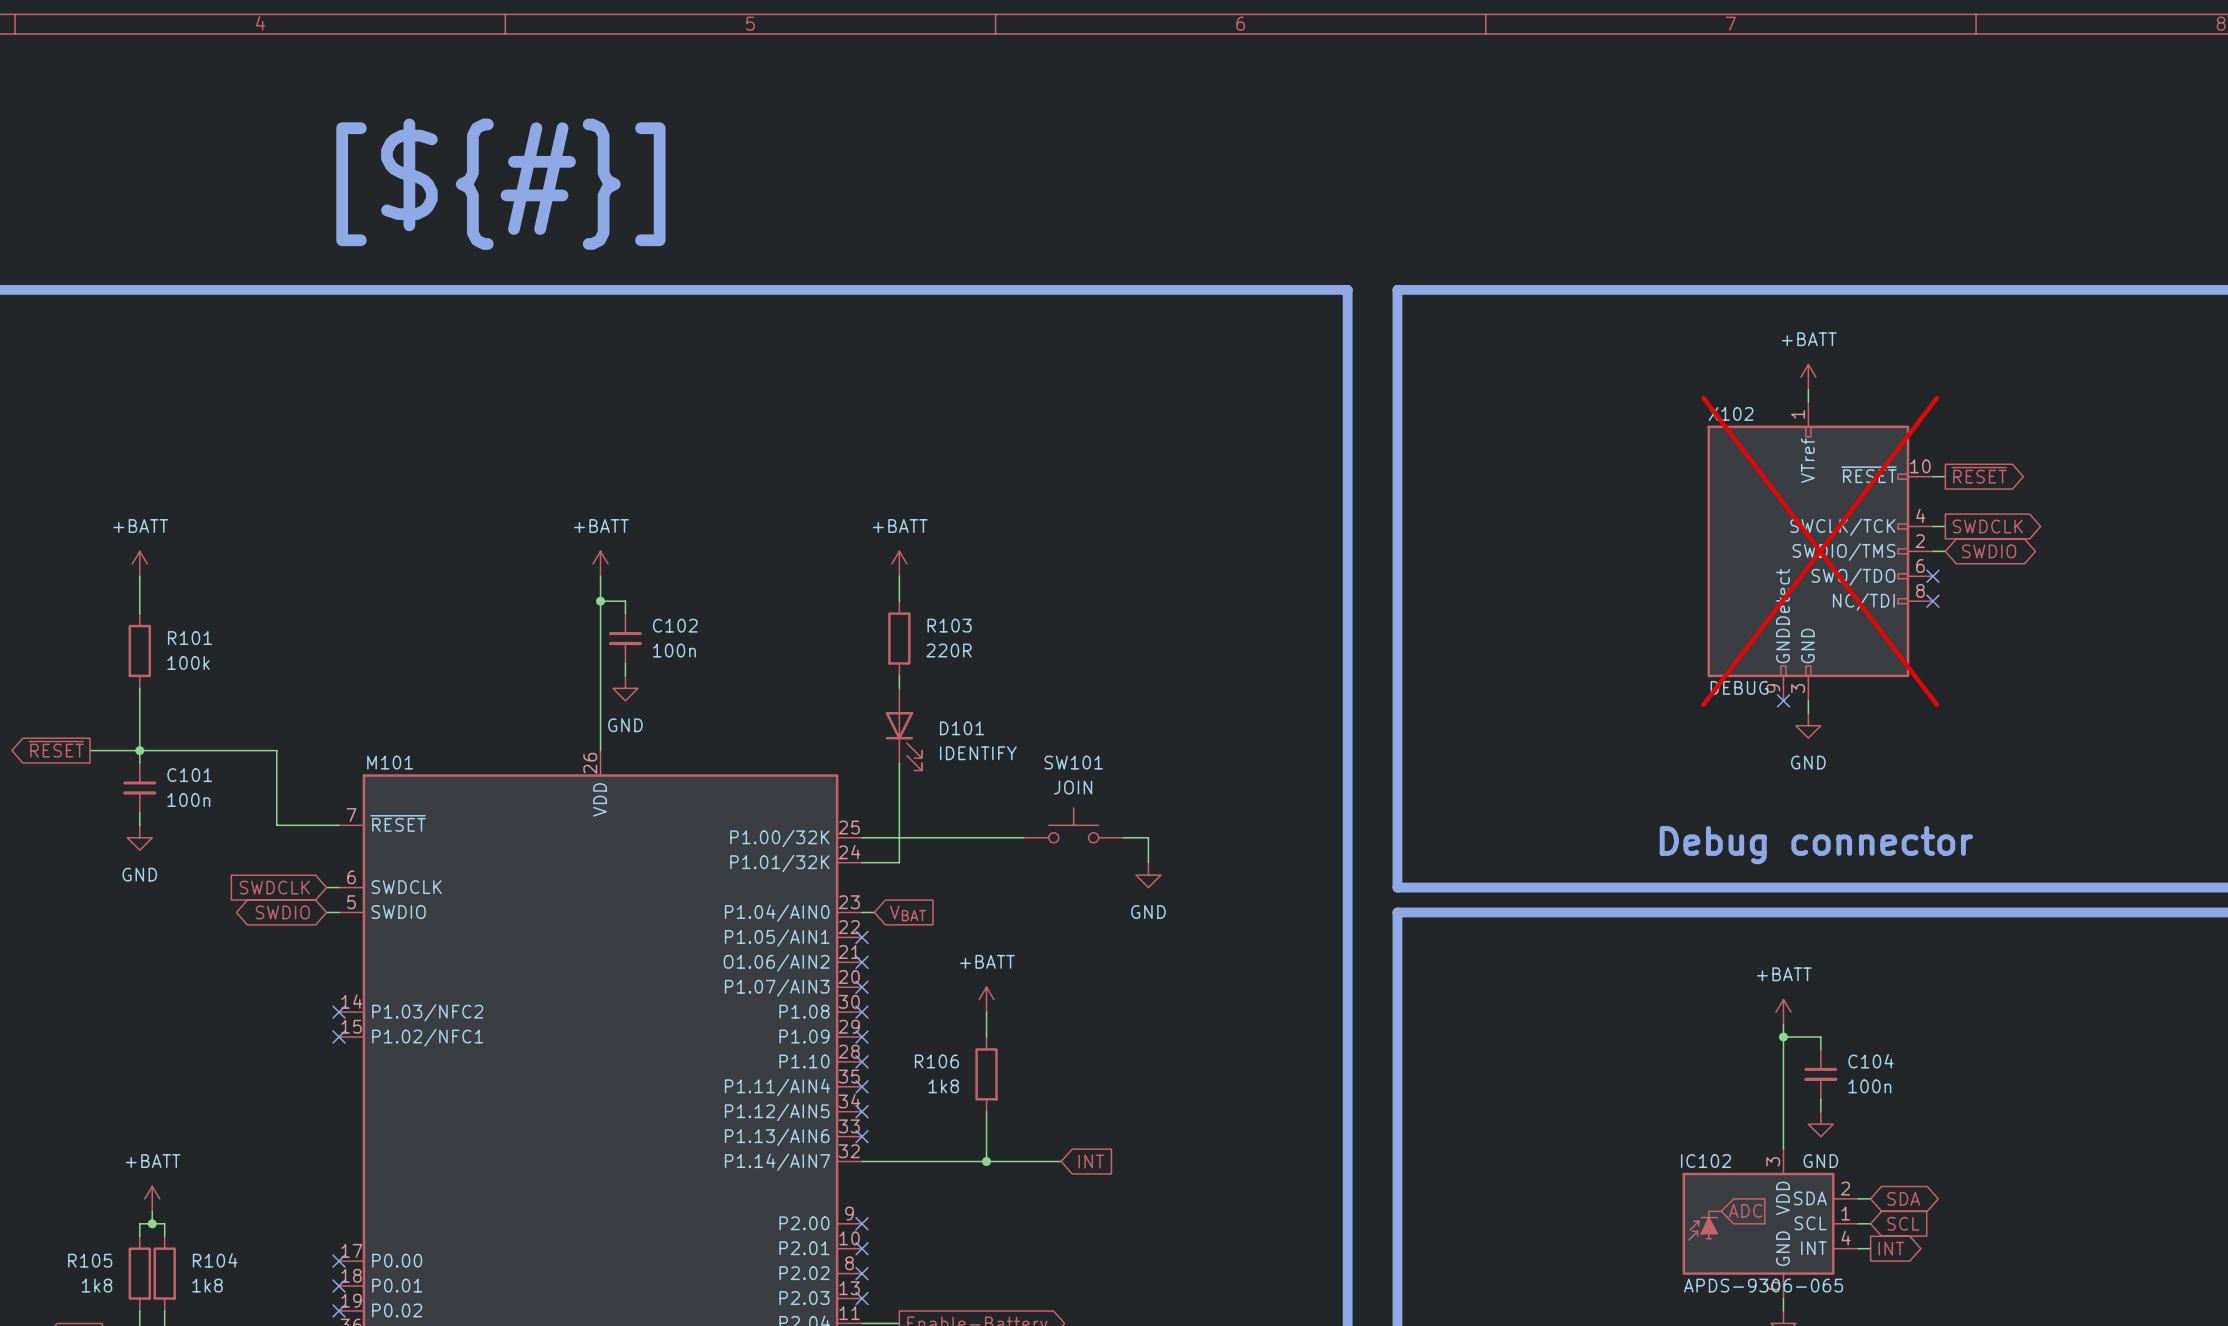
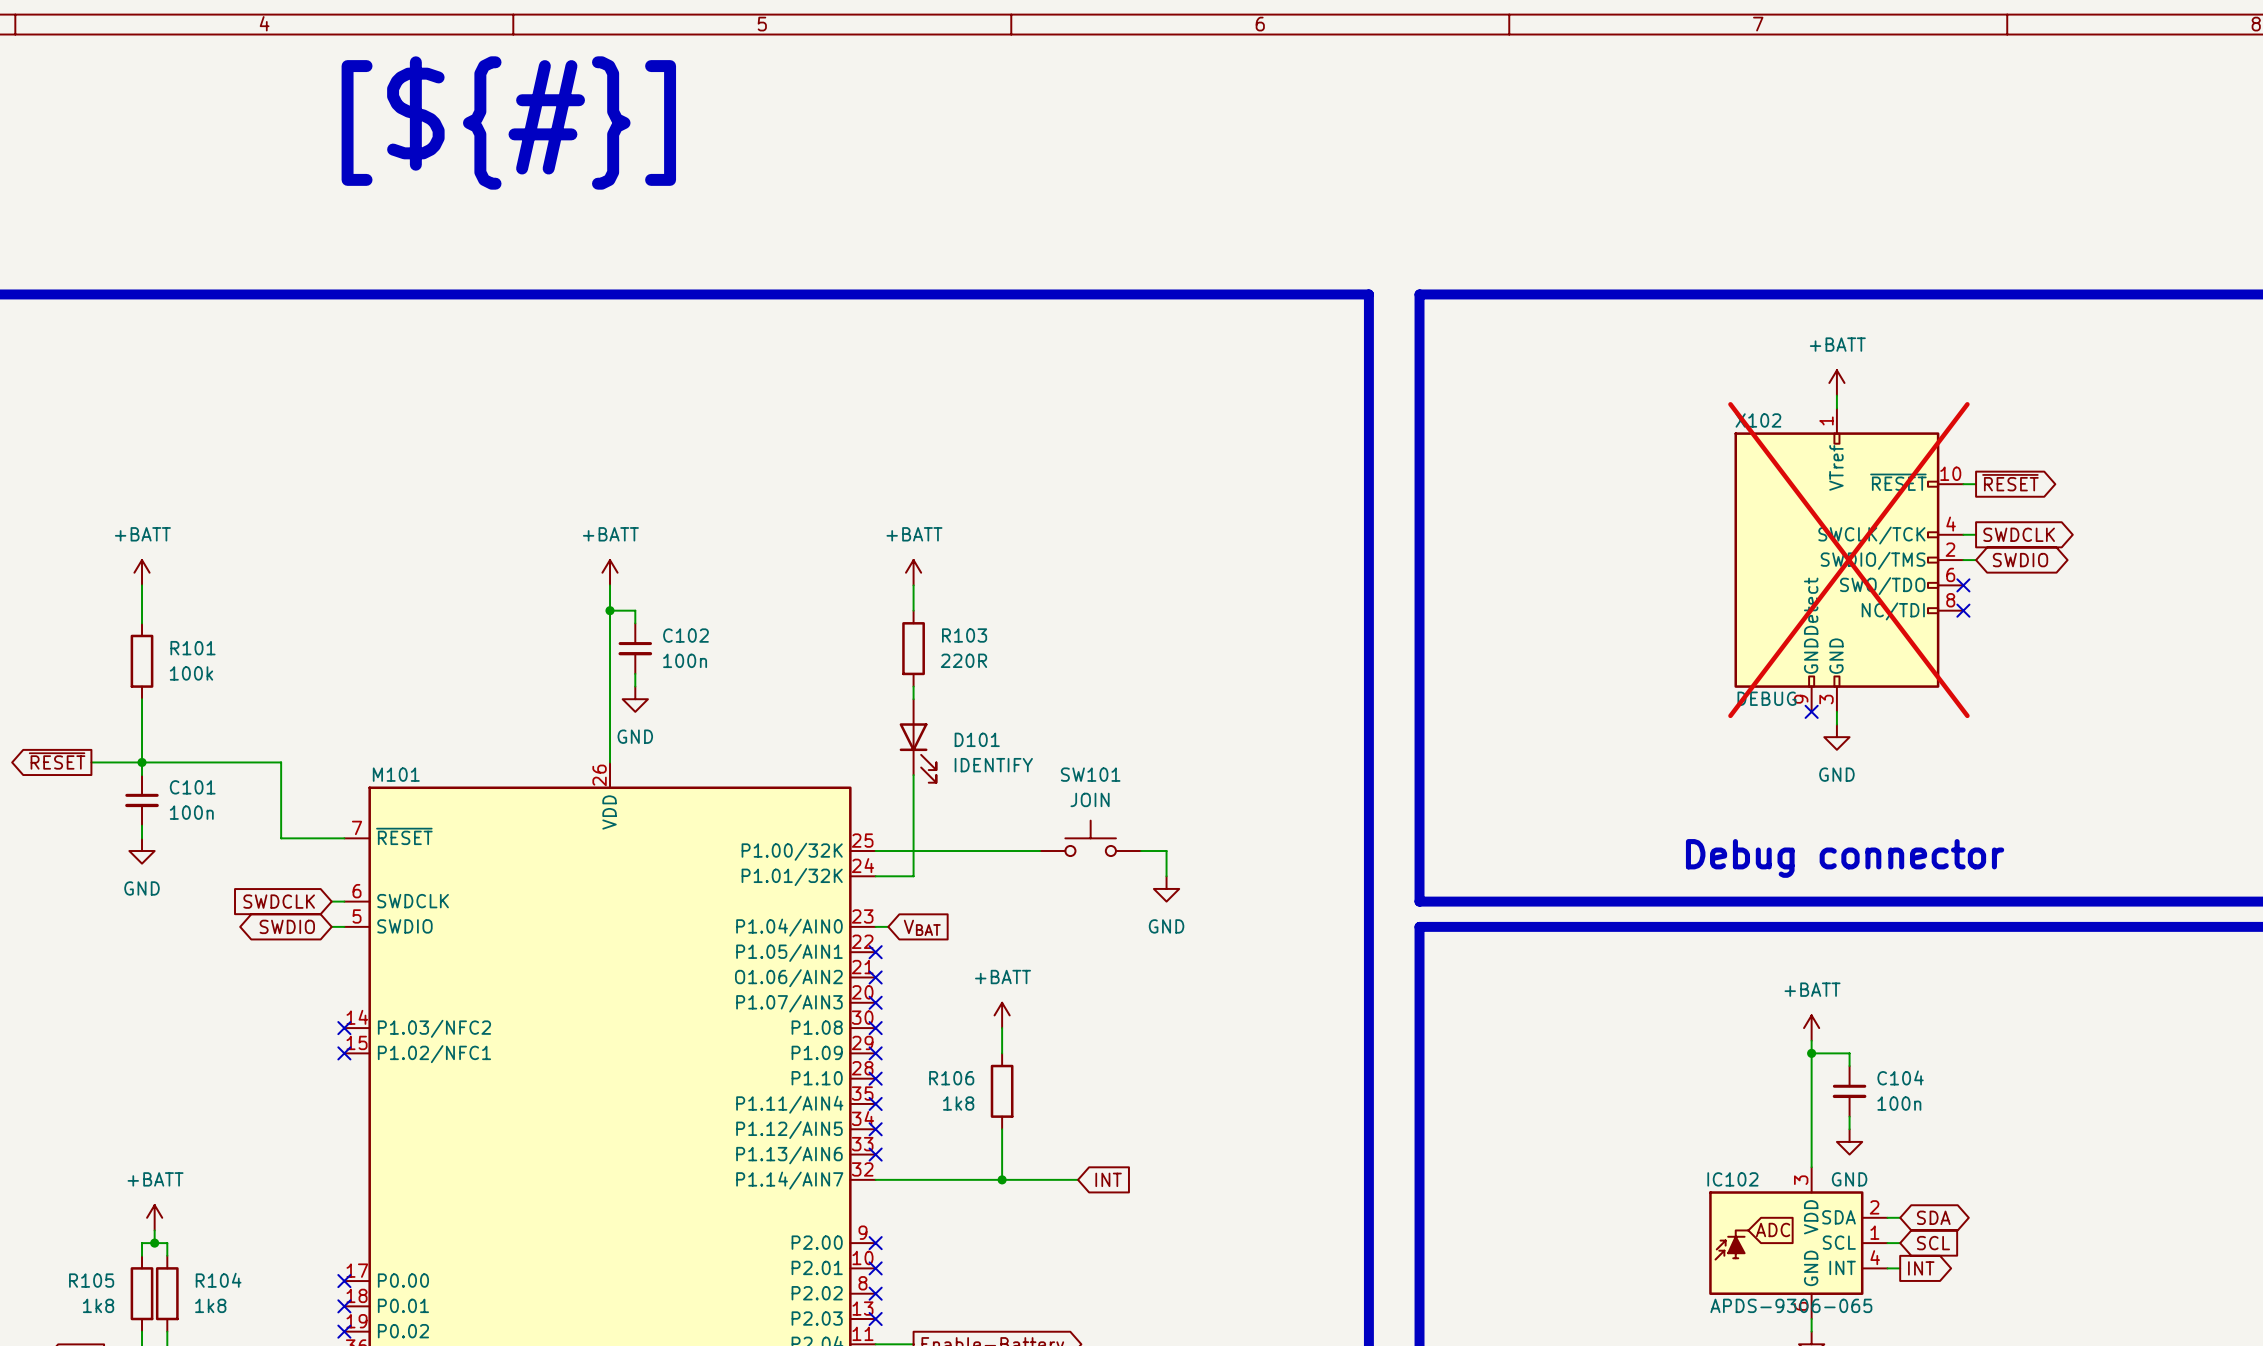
text position: [${#}] (500, 184) -> [${#}] (508, 122)

